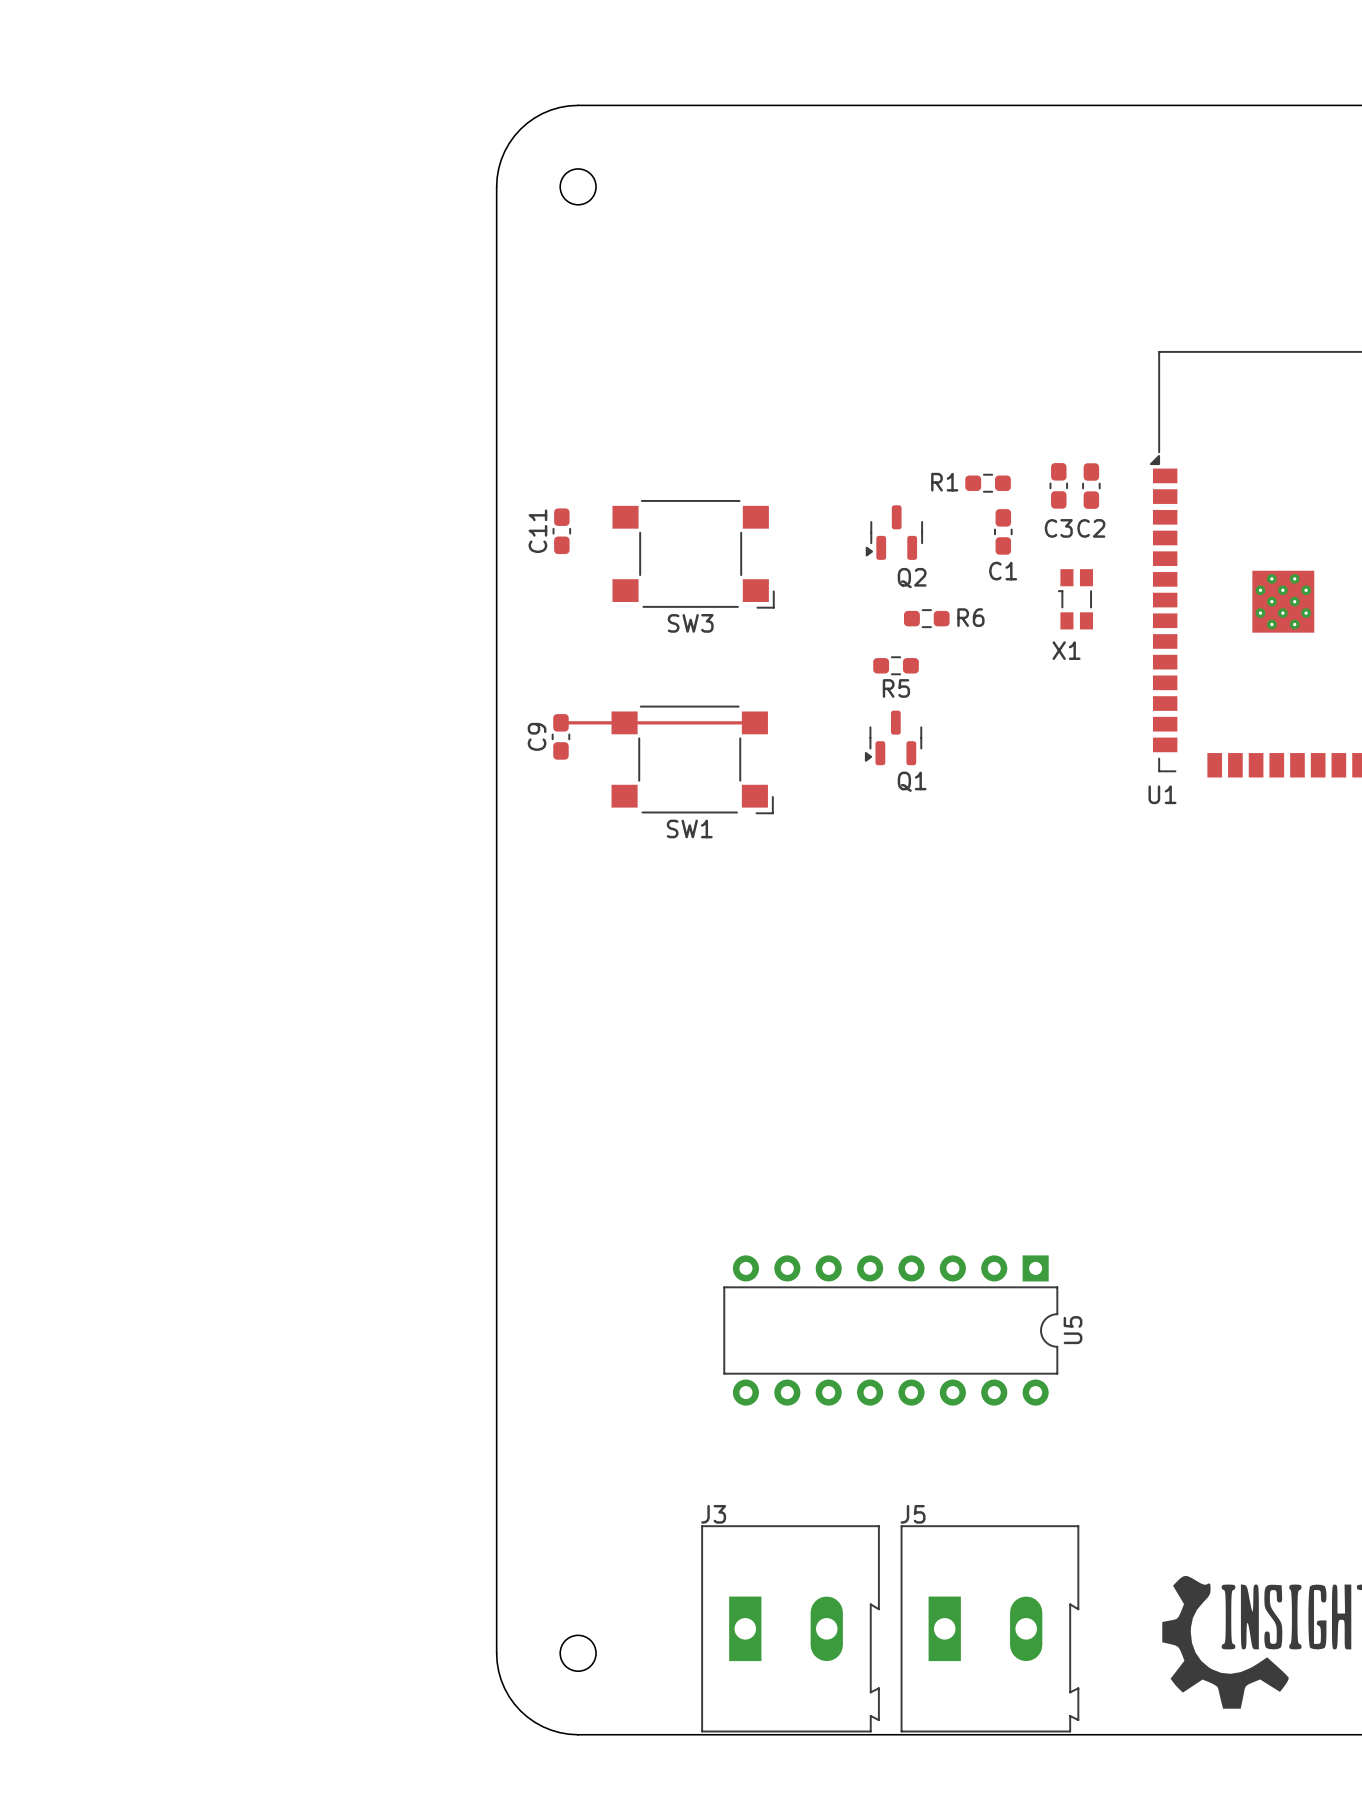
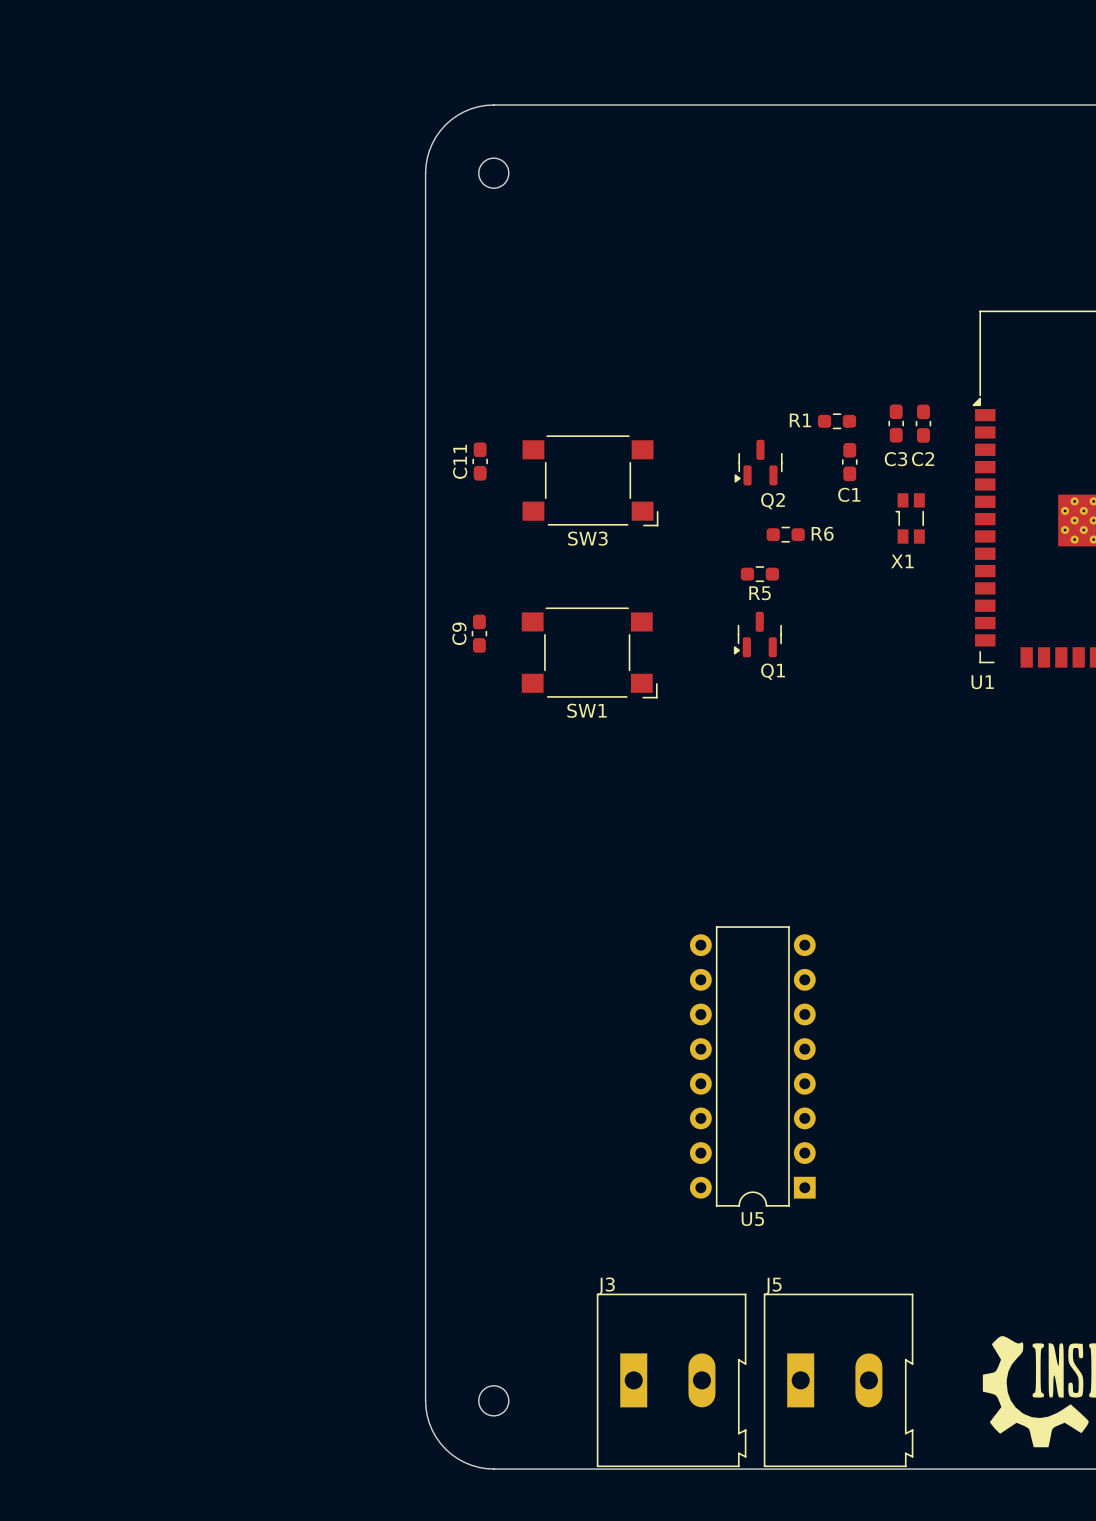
top track: (560, 722) (624, 722) -> none
top track: (624, 722) (754, 722) -> none
U5 rotation: 0° (890, 1330) -> 90° clockwise (752, 1066)

